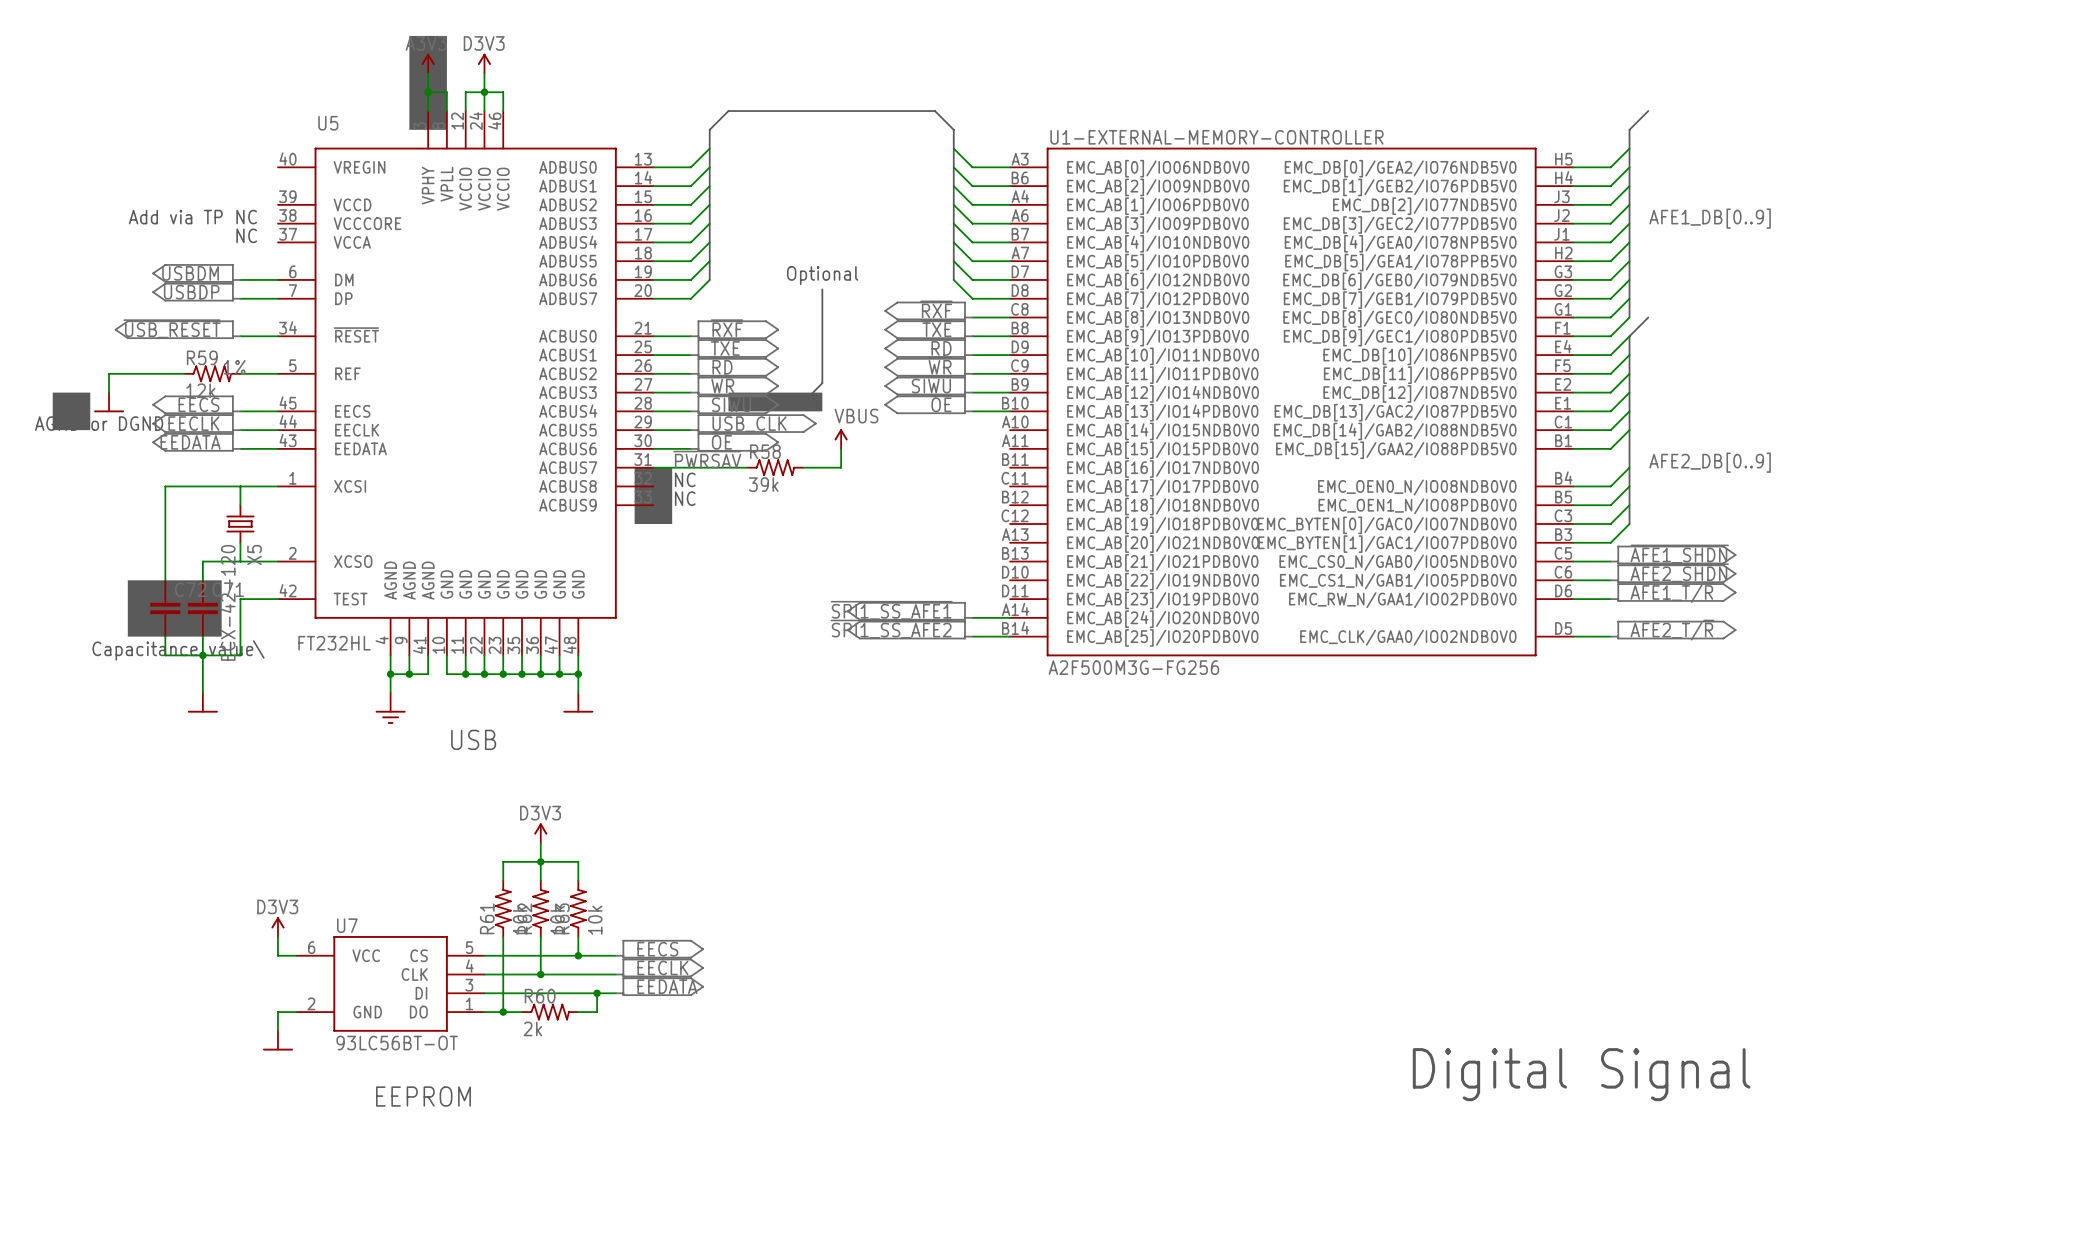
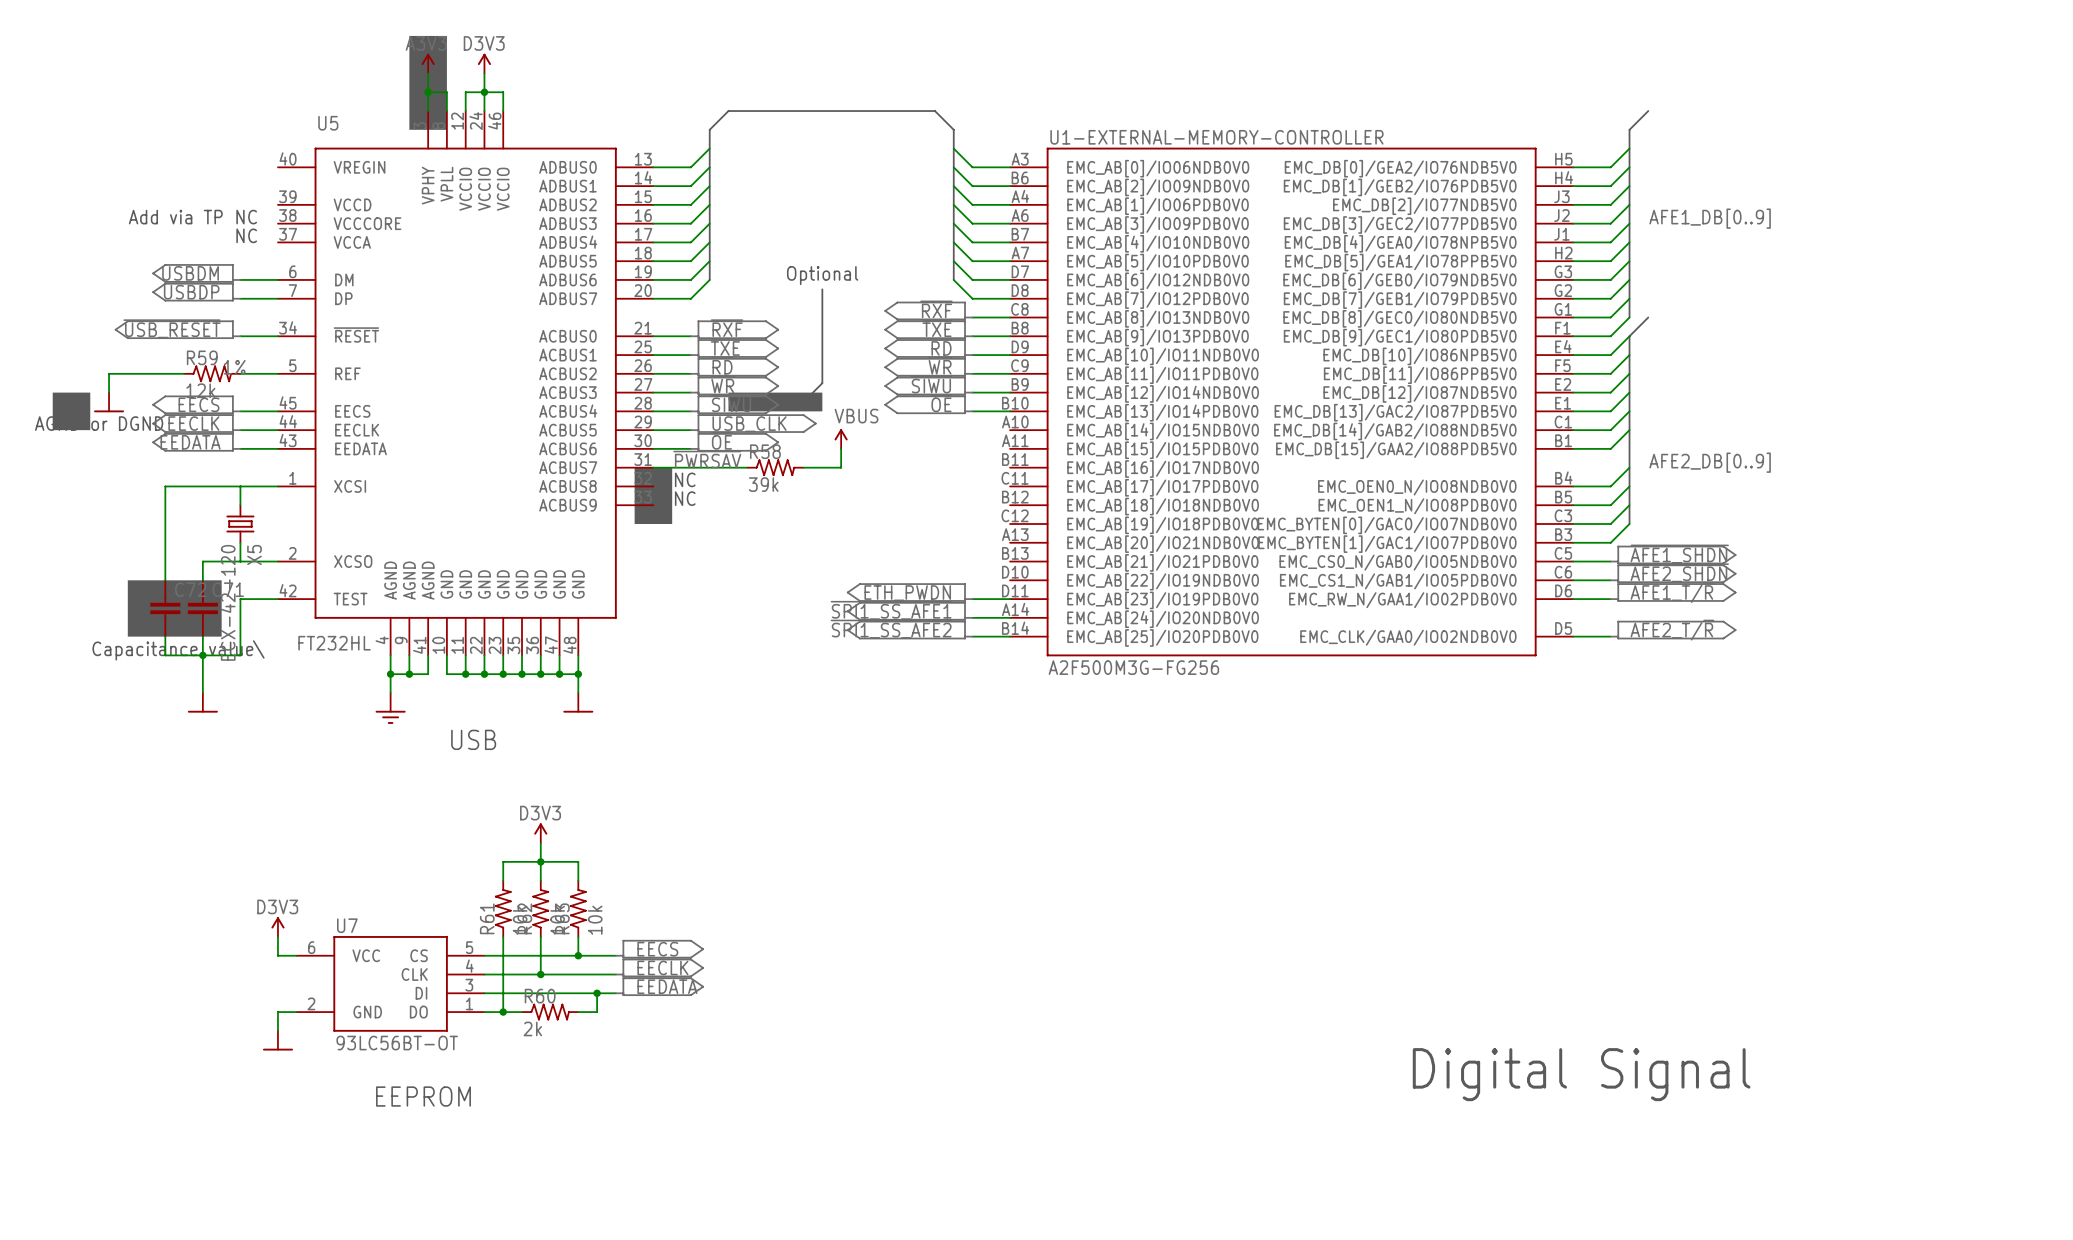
part: none -> (910, 592)
label: none -> ETH_PWDN (907, 593)
wire: none -> (972, 599) (1010, 599)

